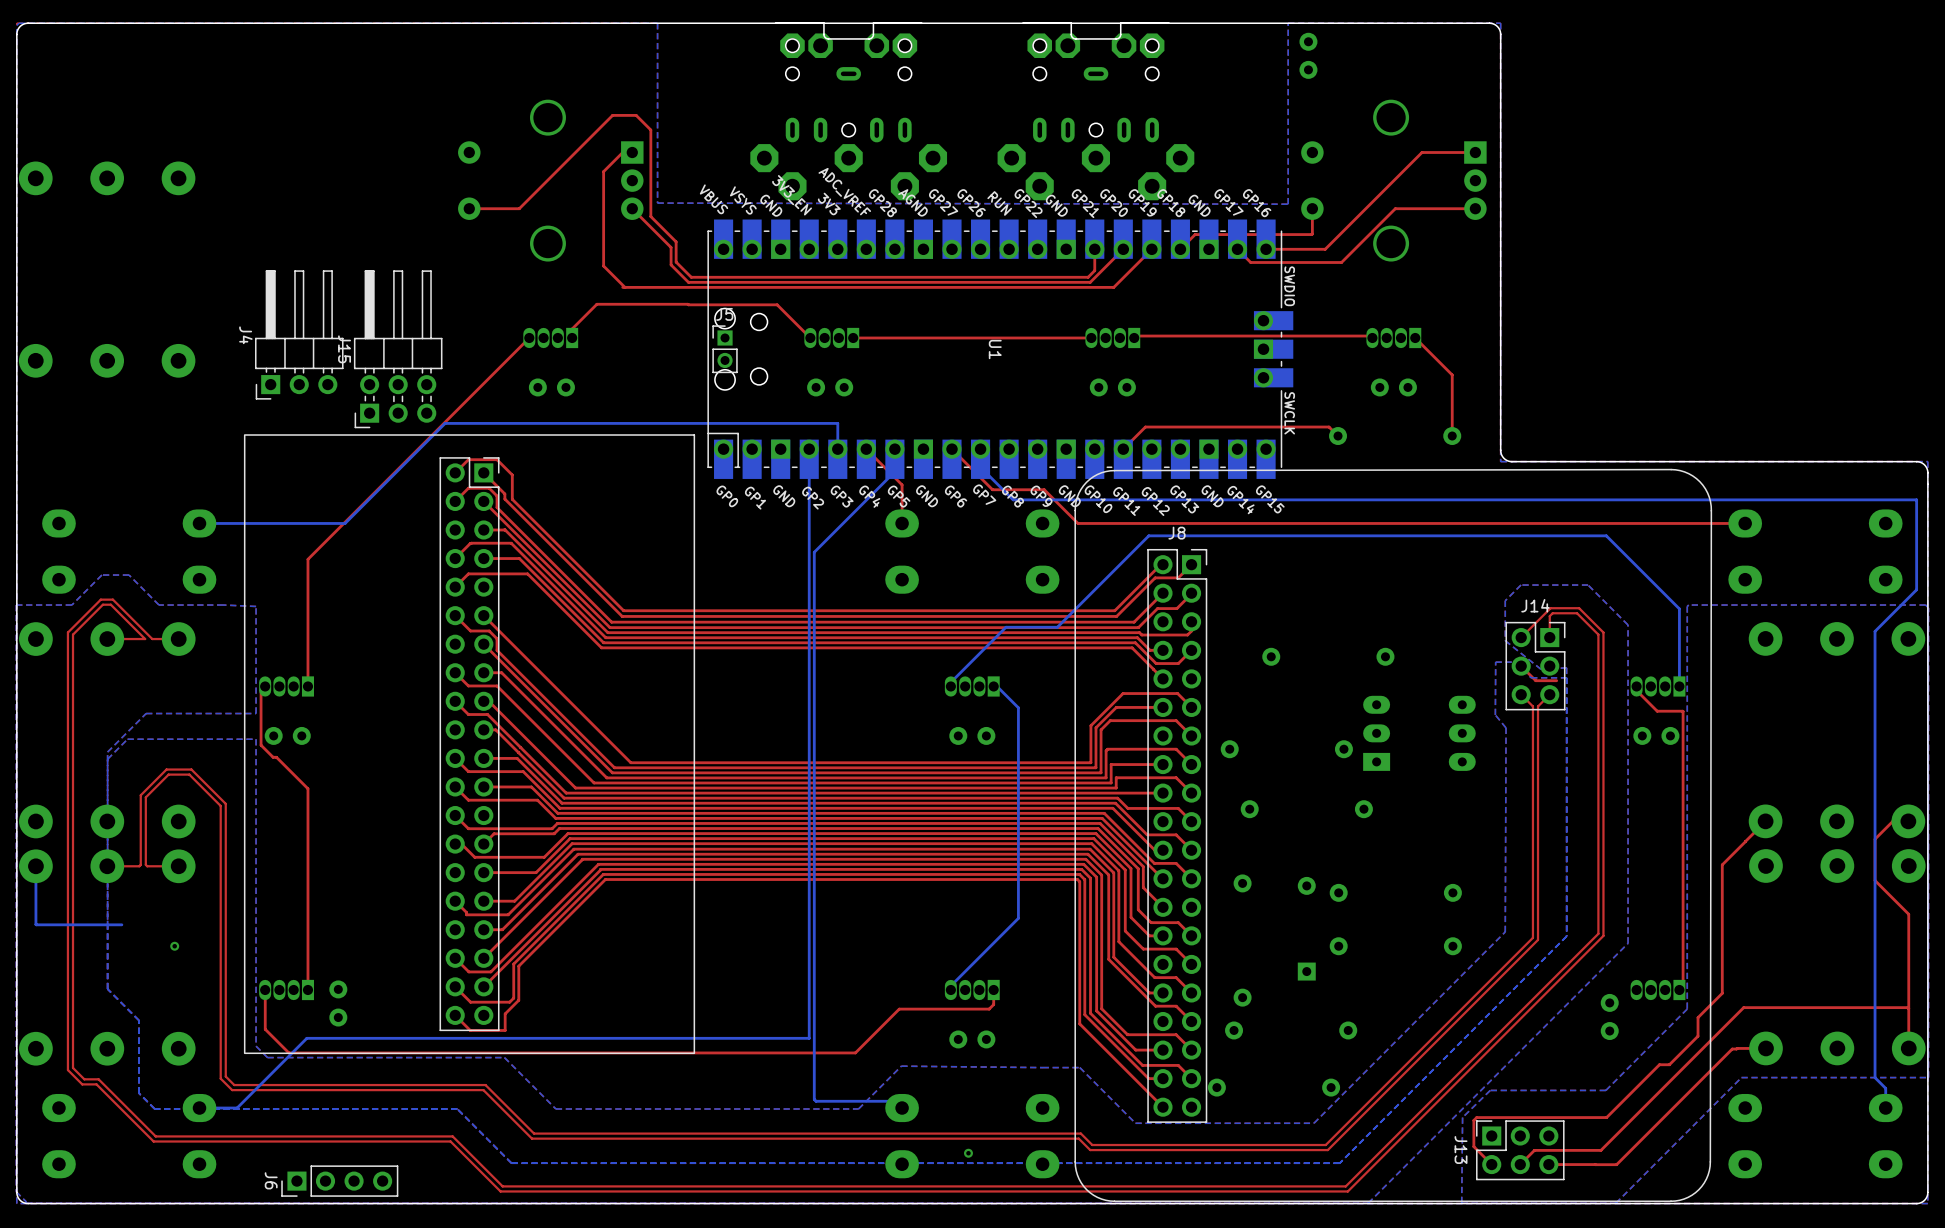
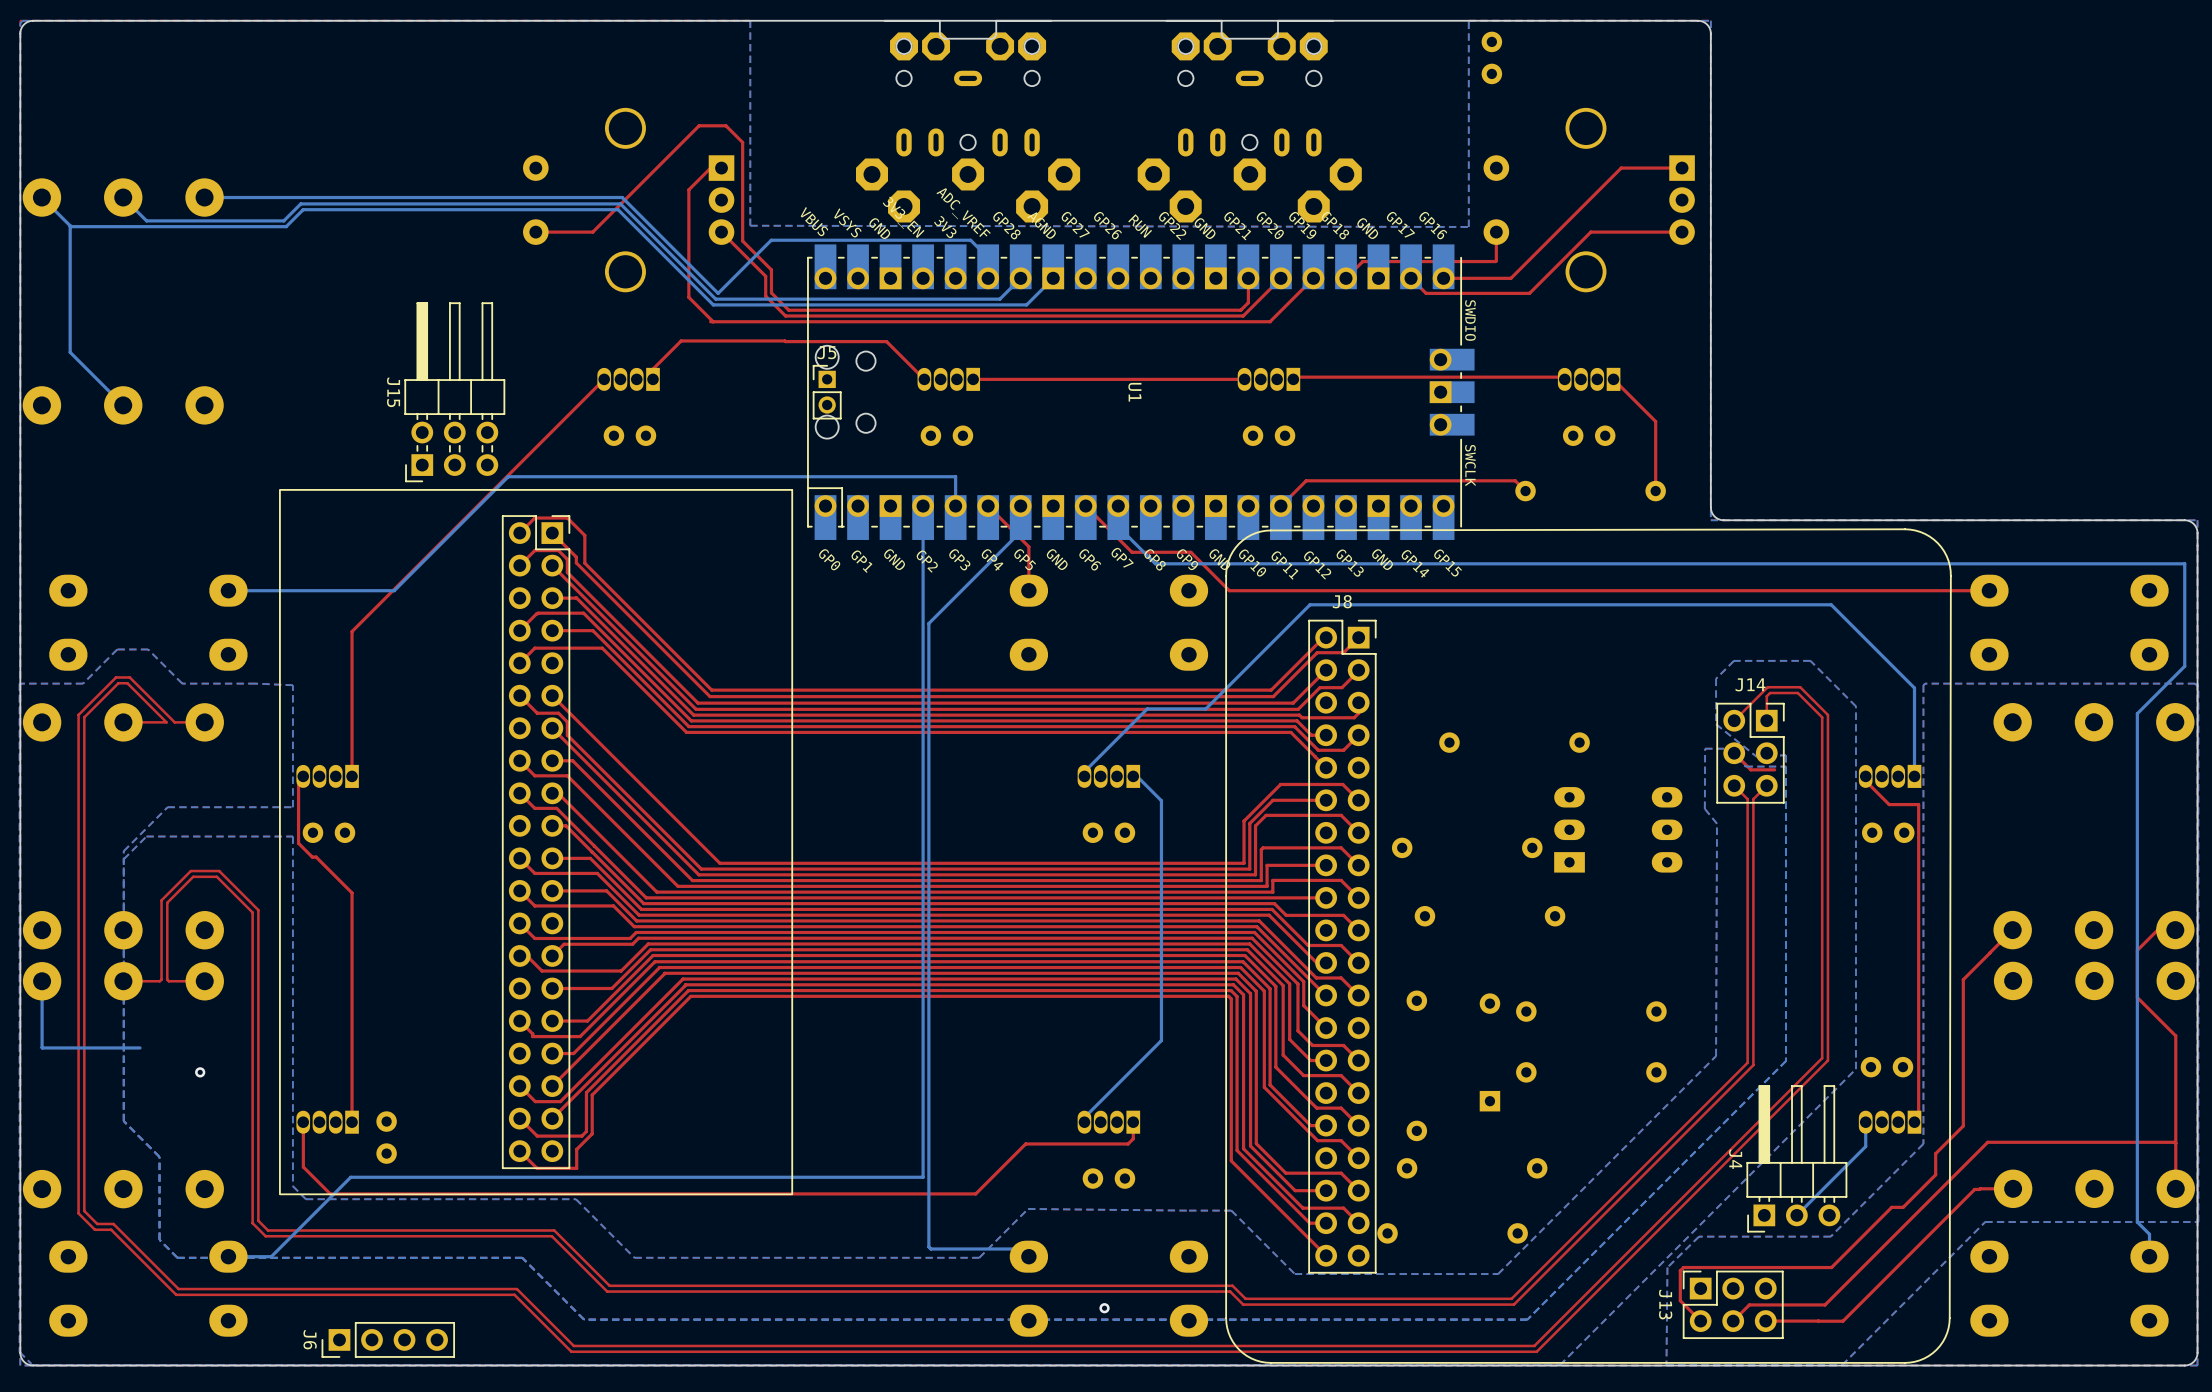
bottom track: none -> (41, 197) (71, 226) (286, 226) (303, 209) (618, 209) (713, 304) (1026, 304) (1053, 278)
bottom track: none -> (123, 197) (146, 220) (283, 220) (300, 203) (620, 203) (715, 299) (999, 299) (1020, 278)
bottom track: none -> (204, 197) (622, 197) (718, 293) (771, 240) (970, 240) (988, 257) (988, 278)
bottom track: none -> (70, 225) (70, 352) (123, 405)
J4 position: (299, 334) -> (1796, 1158)
bottom track: none -> (1865, 1122) (1865, 1146) (1796, 1215)
part rotation: 0° (1609, 1016) -> 90° clockwise (1886, 1067)
part position: (1609, 1016) -> (1886, 1067)

